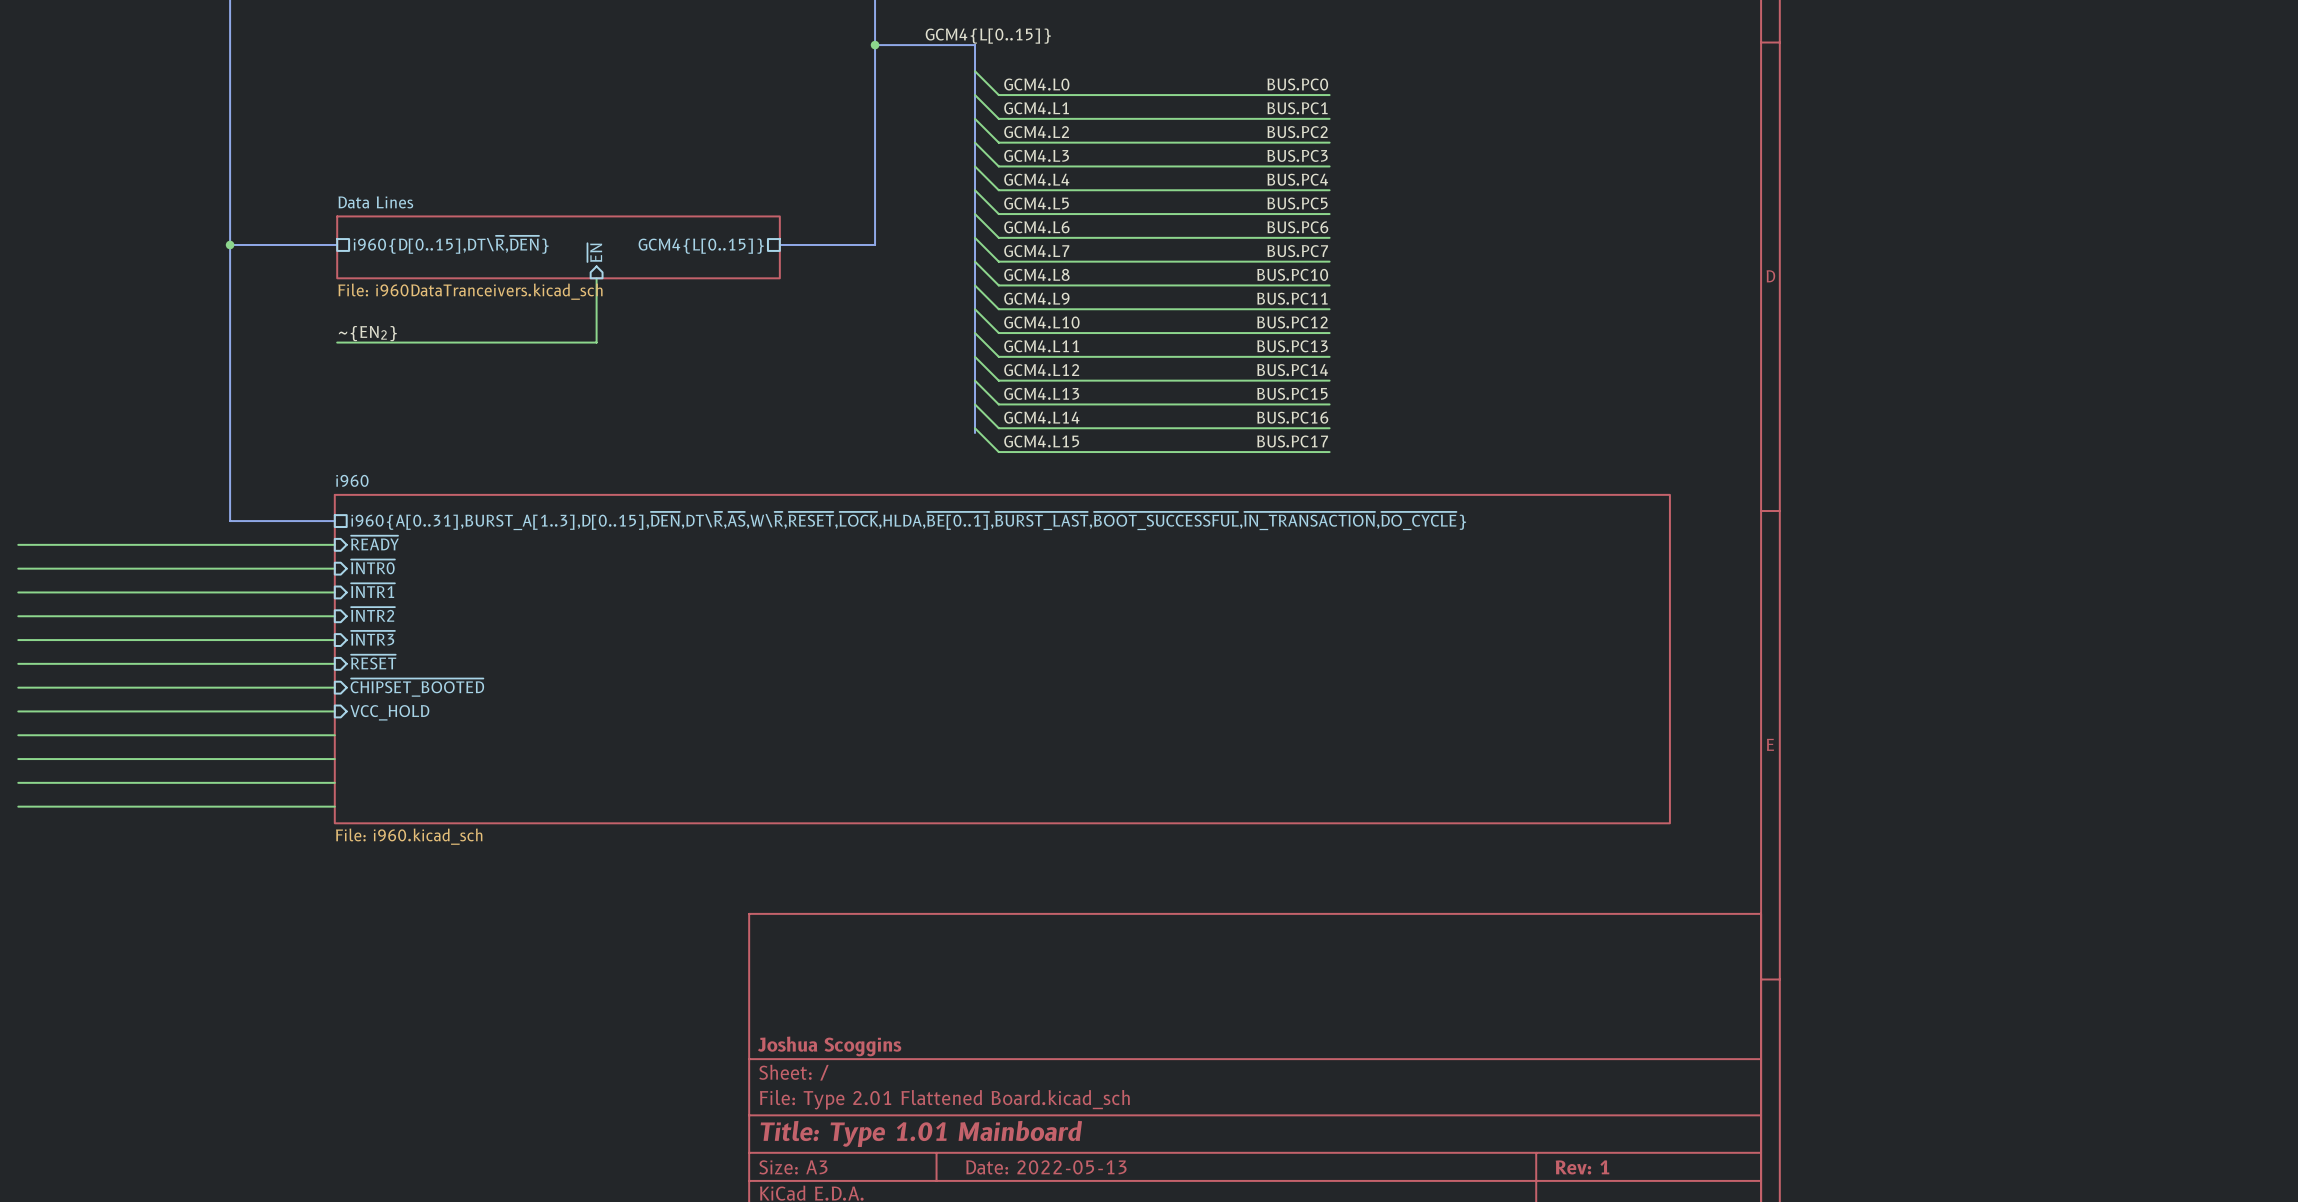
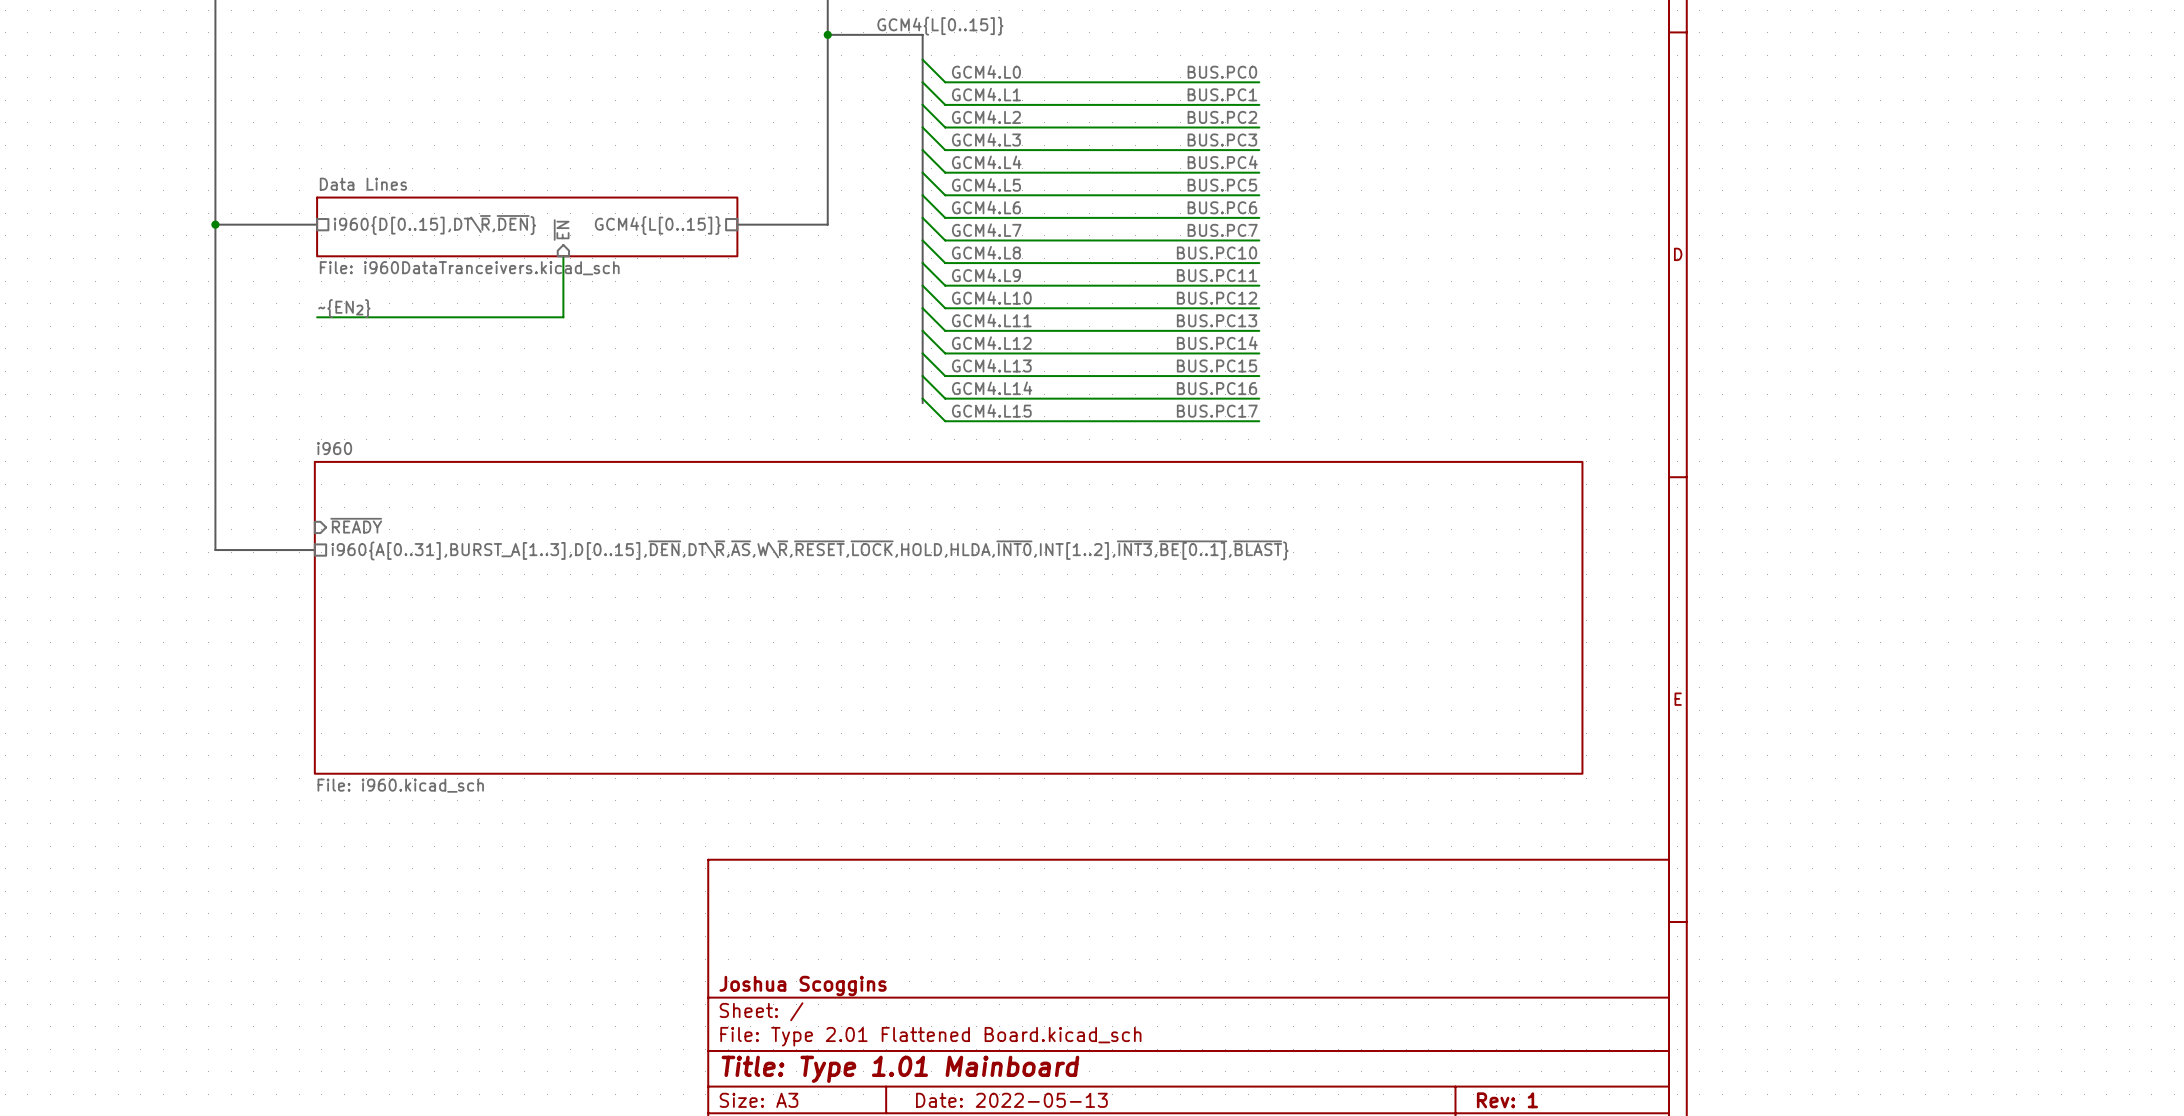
bus: (230, 521) (334, 521) -> (215, 486) (215, 550) (314, 550)
sheet pin: i960{A[0..31],BURST_A[1..3],D[0..15],~{DEN},DT\~{R},~{AS},W\~{R},~{RESET},~{LOCK},HLDA,~{BE[0..1]},~{BURST_LAST},~{BOOT_SUCCESSFUL},~{IN_TRANSACTION},~{DO_CYCLE}} (908, 521) -> none
sheet pin position: ~{READY} (374, 543) -> ~{READY} (356, 525)
wire: (18, 544) (334, 544) -> none
sheet pin: ~{INTR0} (373, 566) -> none
wire: (18, 568) (334, 568) -> none
sheet pin shape: input (373, 590) -> passive (809, 550)
sheet pin: ~{INTR1} (373, 590) -> i960{A[0..31],BURST_A[1..3],D[0..15],~{DEN},DT\~{R},~{AS},W\~{R},~{RESET},~{LOCK},HOLD,HLDA,~{INT0},INT[1..2],~{INT3},~{BE[0..1]},~{BLAST}} (809, 550)
wire: (18, 592) (334, 592) -> none
sheet pin: ~{INTR2} (373, 614) -> none
wire: (18, 616) (334, 616) -> none
sheet pin: ~{INTR3} (373, 638) -> none
wire: (18, 640) (334, 640) -> none
sheet pin: ~{RESET} (373, 662) -> none
wire: (18, 663) (334, 663) -> none
wire: (18, 687) (334, 687) -> none
sheet pin: ~{CHIPSET_BOOTED} (417, 687) -> none
wire: (18, 711) (334, 711) -> none
sheet pin: VCC_HOLD (389, 712) -> none
wire: (18, 735) (334, 735) -> none
wire: (18, 759) (334, 759) -> none
wire: (18, 782) (334, 782) -> none
wire: (18, 806) (334, 806) -> none

